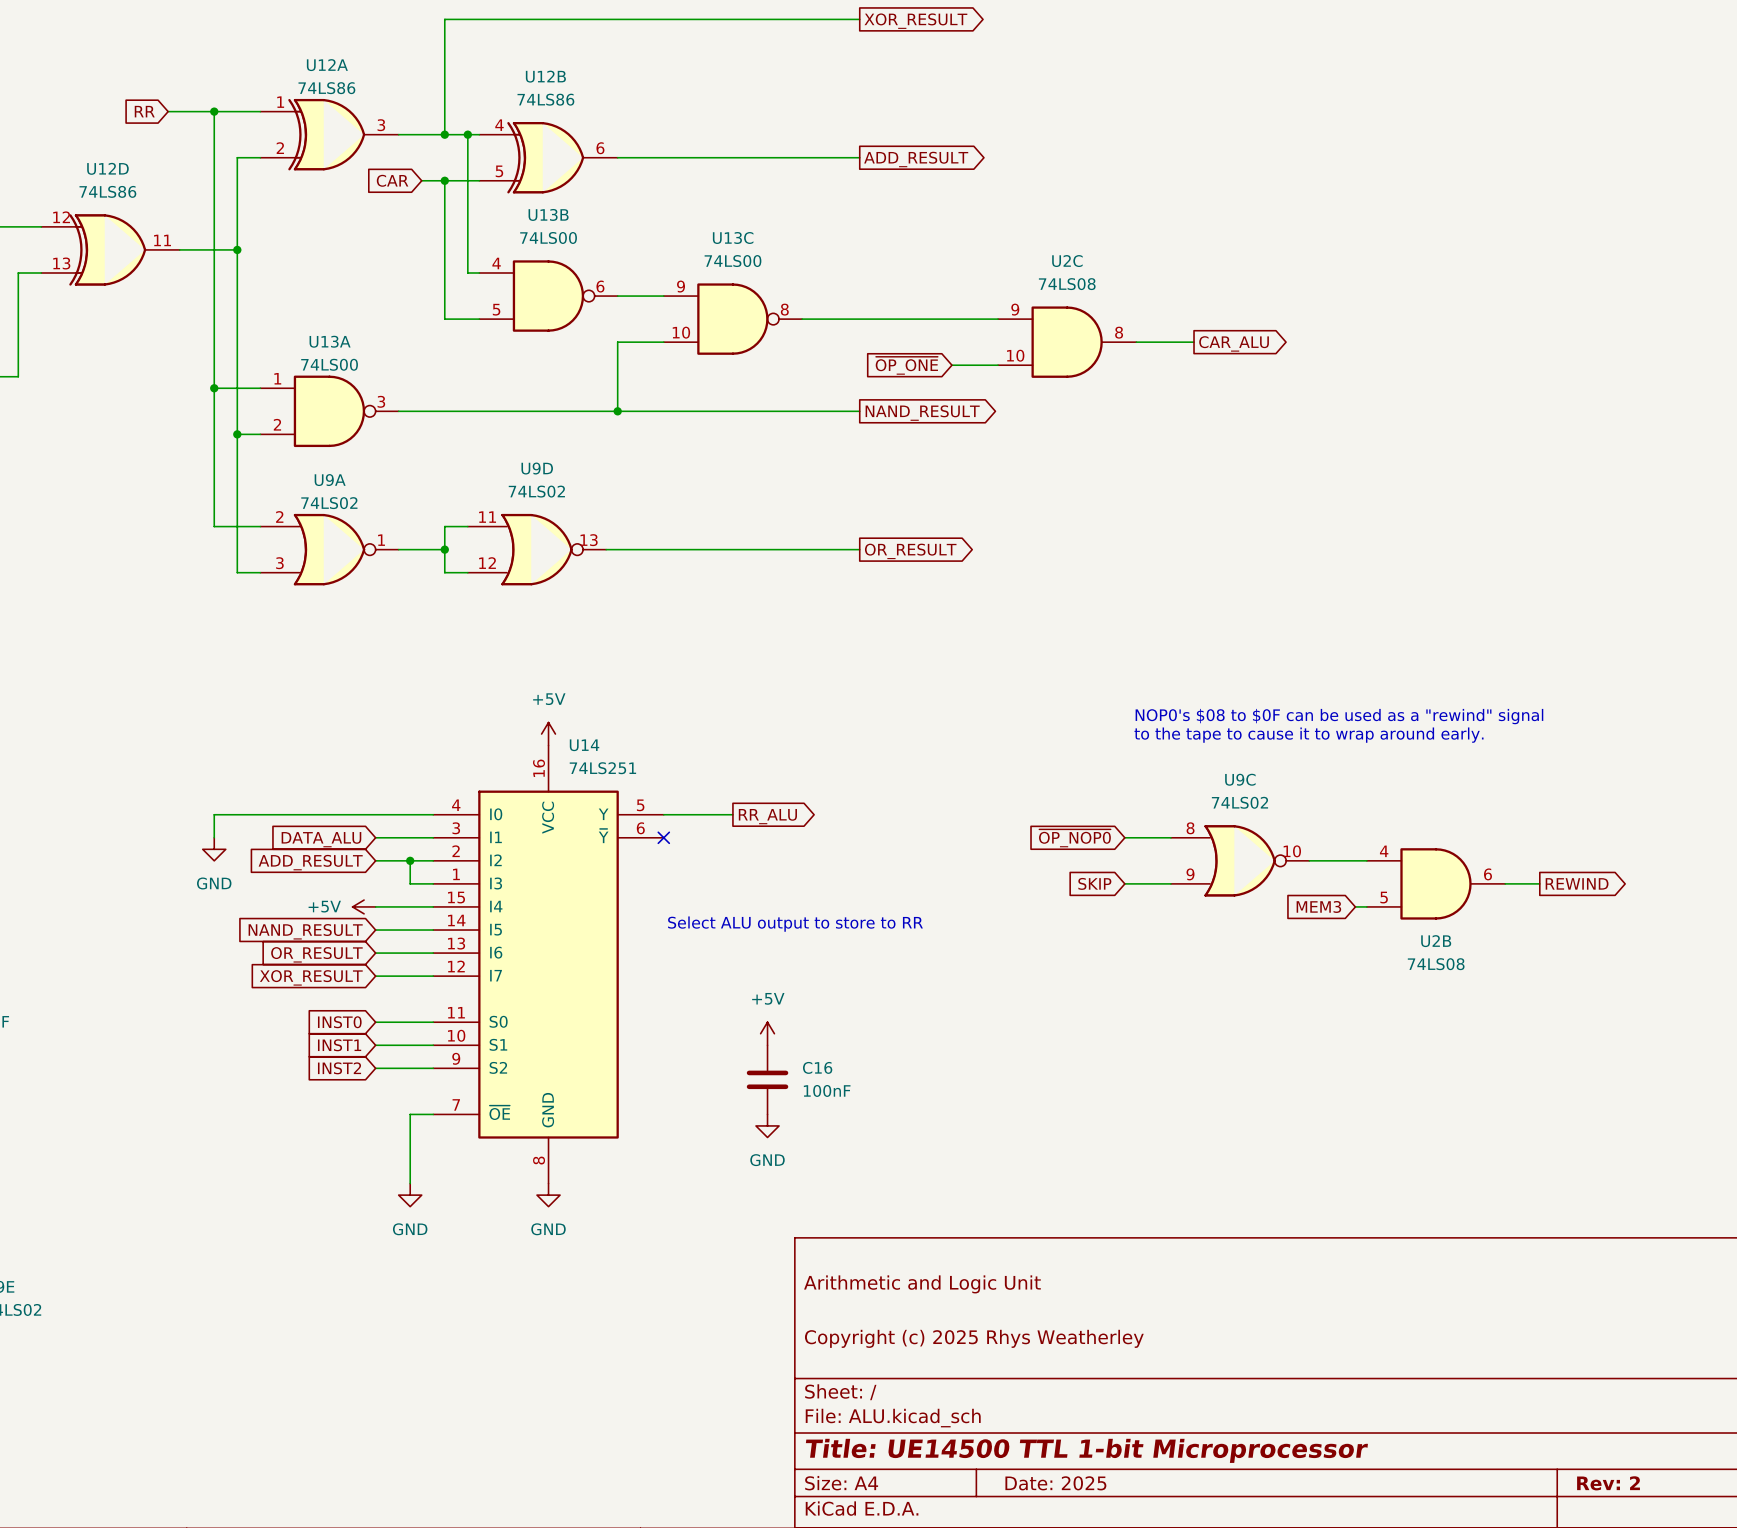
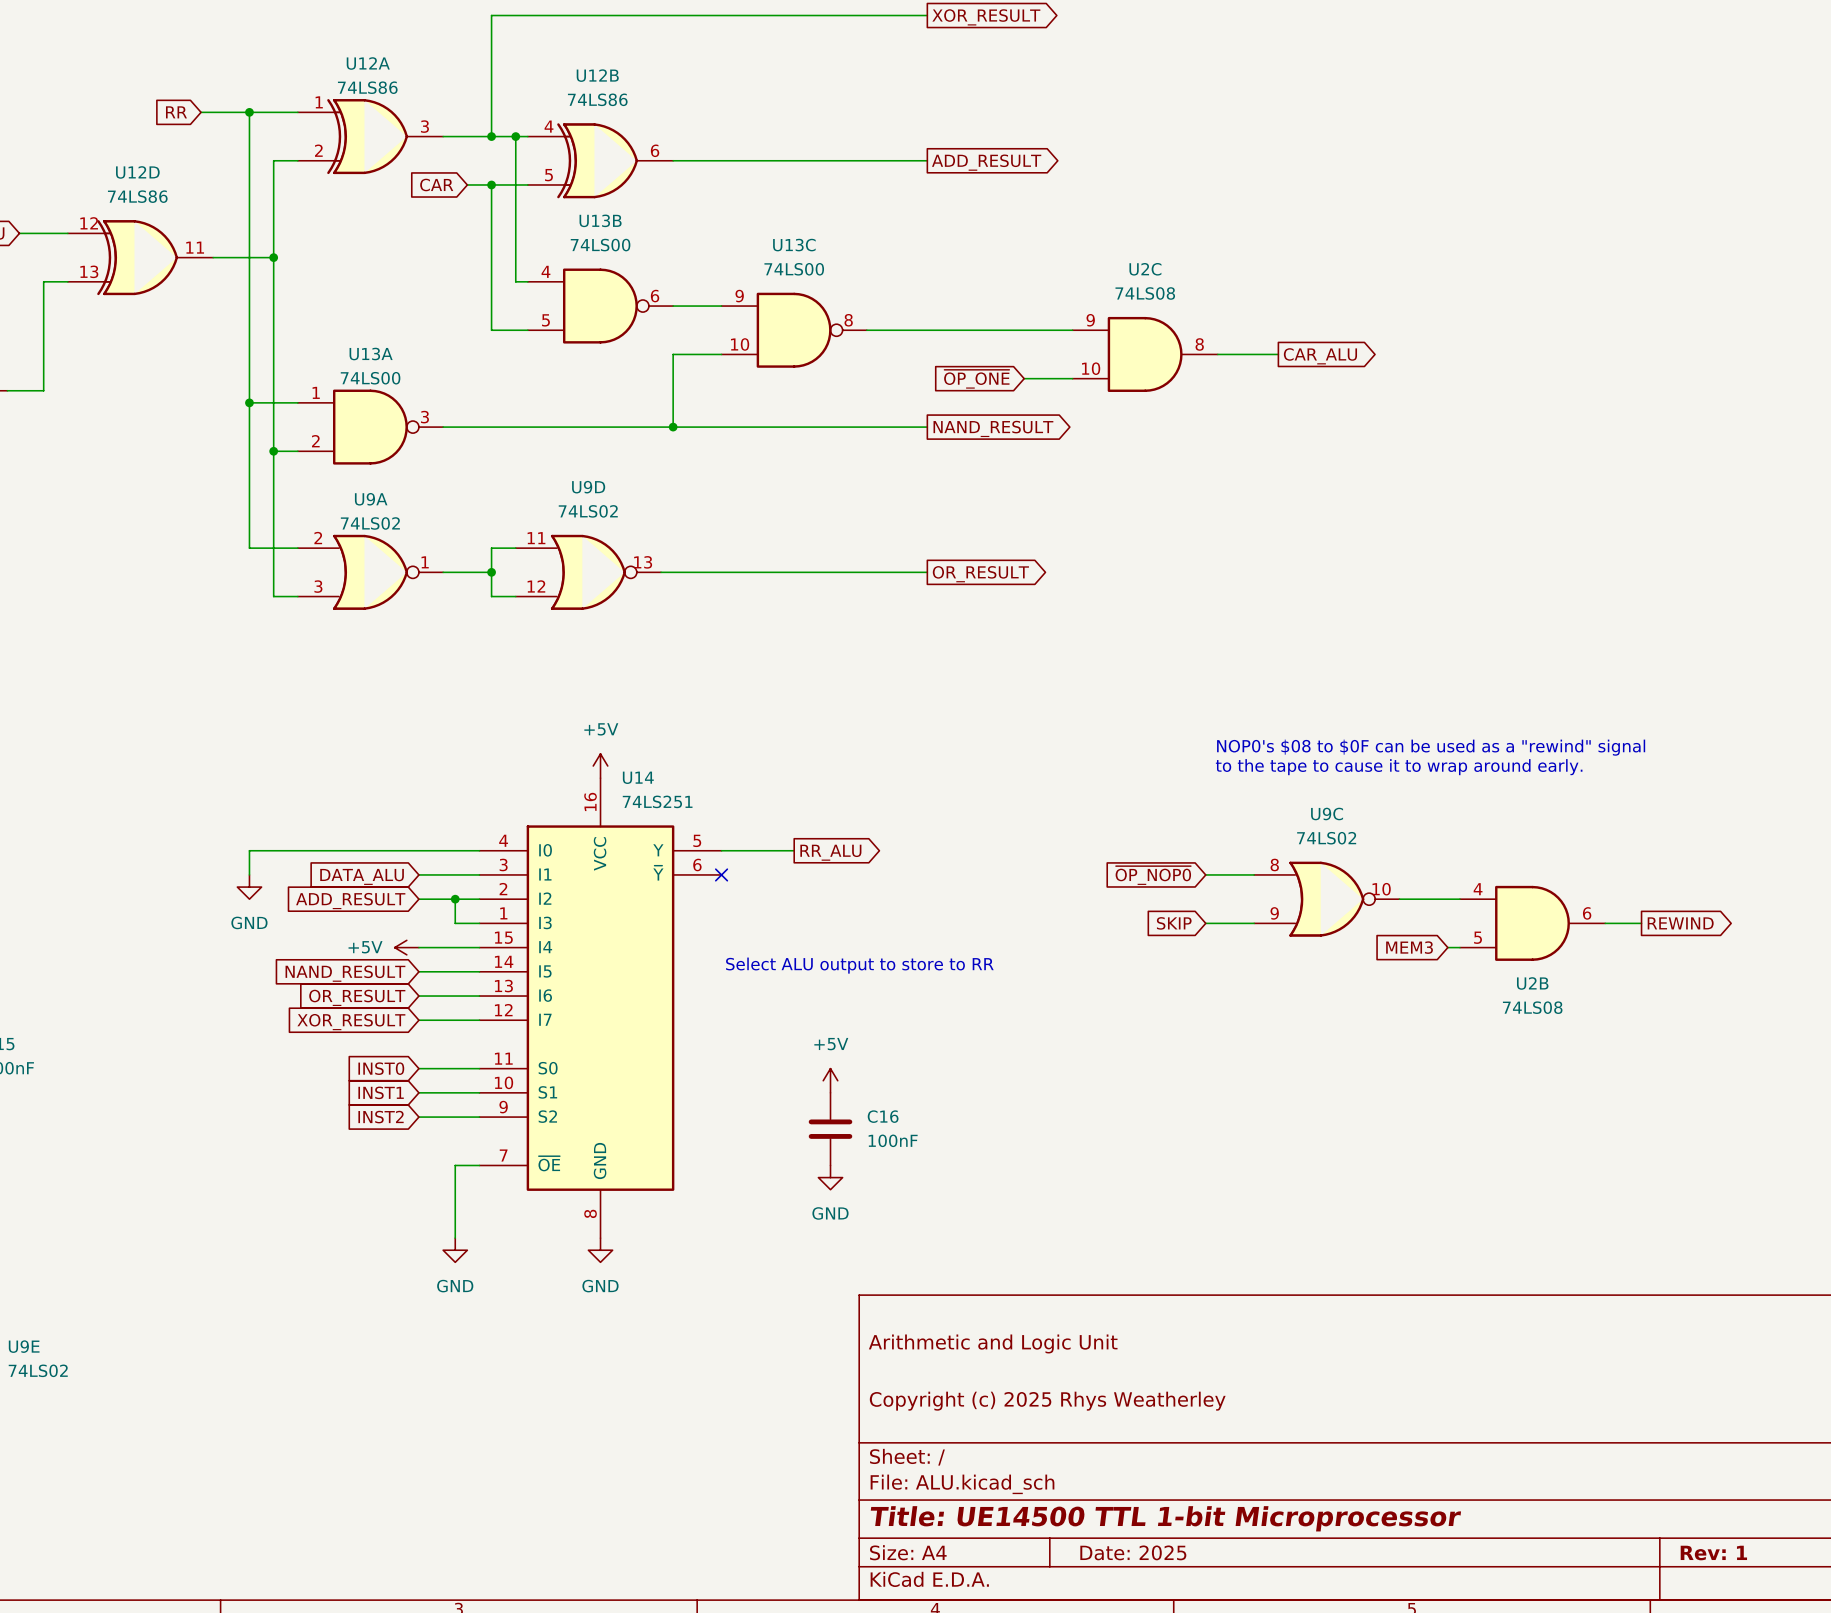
title block: Rev: 2 (1608, 1483) -> Rev: 1 (1713, 1553)

